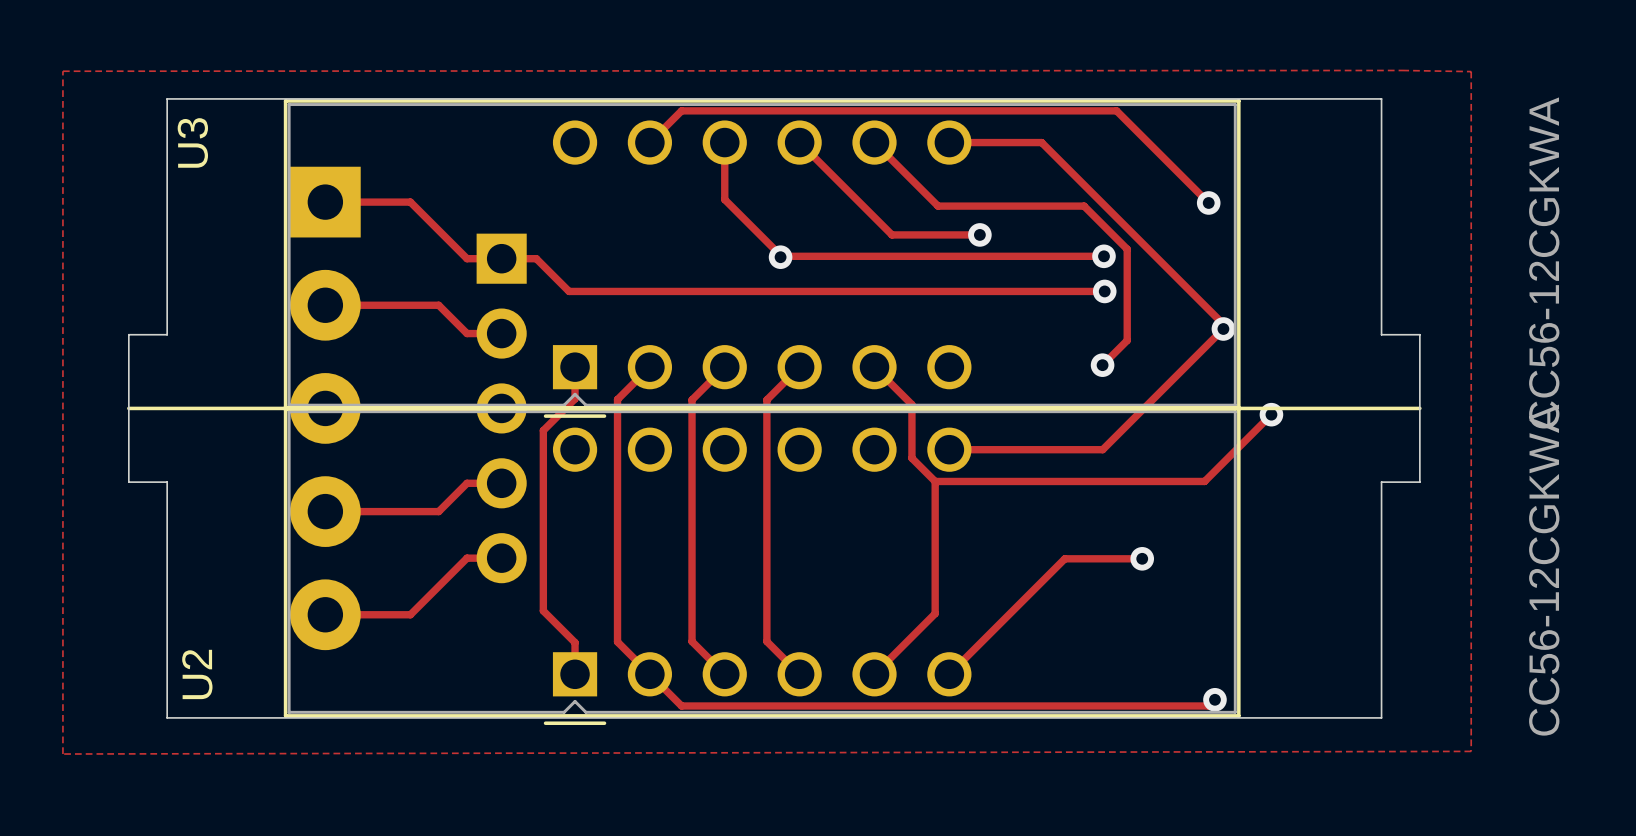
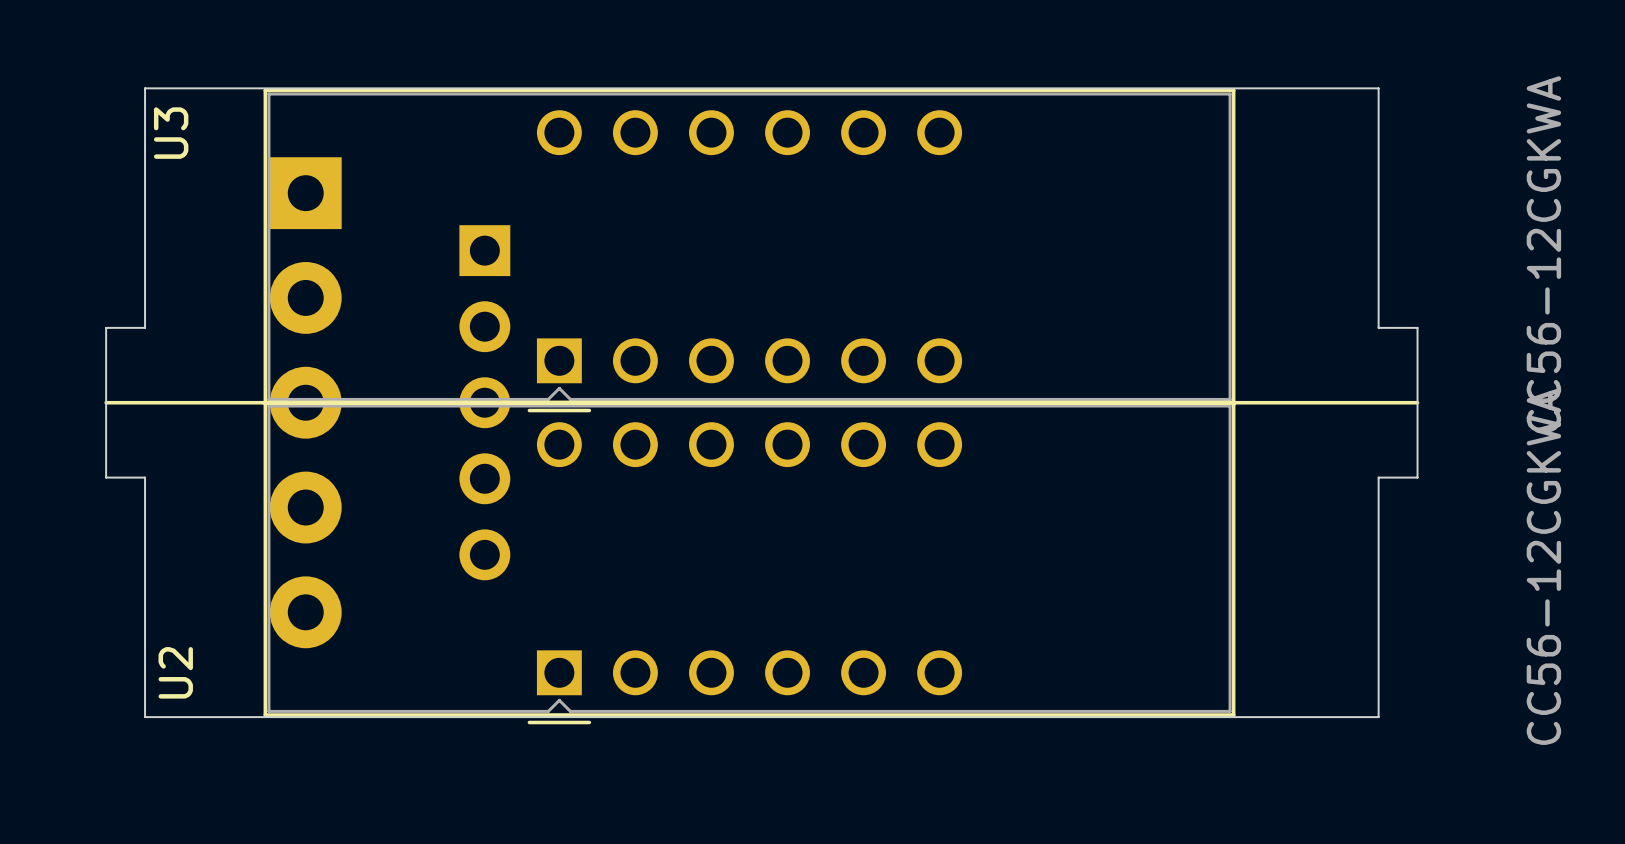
zone outline: (1402, 70) (62, 71) (62, 754) (1471, 751) (1471, 71) (1402, 70) -> none
track: (649, 142) (681, 110) (1116, 110) (1208, 202) -> none
track: (724, 142) (724, 199) (781, 256) -> none
track: (799, 142) (892, 234) (979, 234) -> none
track: (874, 142) (938, 206) (1084, 206) (1127, 249) (1127, 340) (1102, 365) -> none
track: (949, 142) (1041, 142) (1223, 324) (1223, 328) (1102, 449) (949, 449) -> none
track: (325, 202) (410, 202) (467, 258) (536, 258) (569, 291) (1104, 291) -> none
via: (1208, 202) -> none
via: (979, 234) -> none
track: (781, 256) (1103, 256) -> none
via: (1103, 256) -> none
via: (780, 257) -> none
via: (1104, 291) -> none
track: (325, 305) (438, 305) (467, 333) (501, 333) -> none
via: (1223, 328) -> none
via: (1102, 365) -> none
track: (575, 367) (575, 398) (543, 430) (543, 610) (575, 642) (575, 674) -> none
track: (649, 367) (617, 399) (617, 641) (681, 706) (1208, 706) (1214, 699) -> none
track: (724, 367) (692, 399) (692, 641) (724, 674) -> none
track: (799, 367) (766, 399) (766, 641) (799, 674) -> none
track: (874, 367) (911, 404) (911, 458) (935, 481) -> none
track: (1271, 414) (1204, 481) (935, 481) -> none
via: (1271, 414) -> none
track: (935, 481) (935, 613) (874, 674) -> none
track: (501, 483) (467, 483) (438, 511) (325, 511) -> none
track: (501, 558) (467, 558) (410, 614) (325, 614) -> none
track: (1142, 558) (1064, 558) (949, 674) -> none
via: (1142, 558) -> none
via: (1214, 699) -> none

